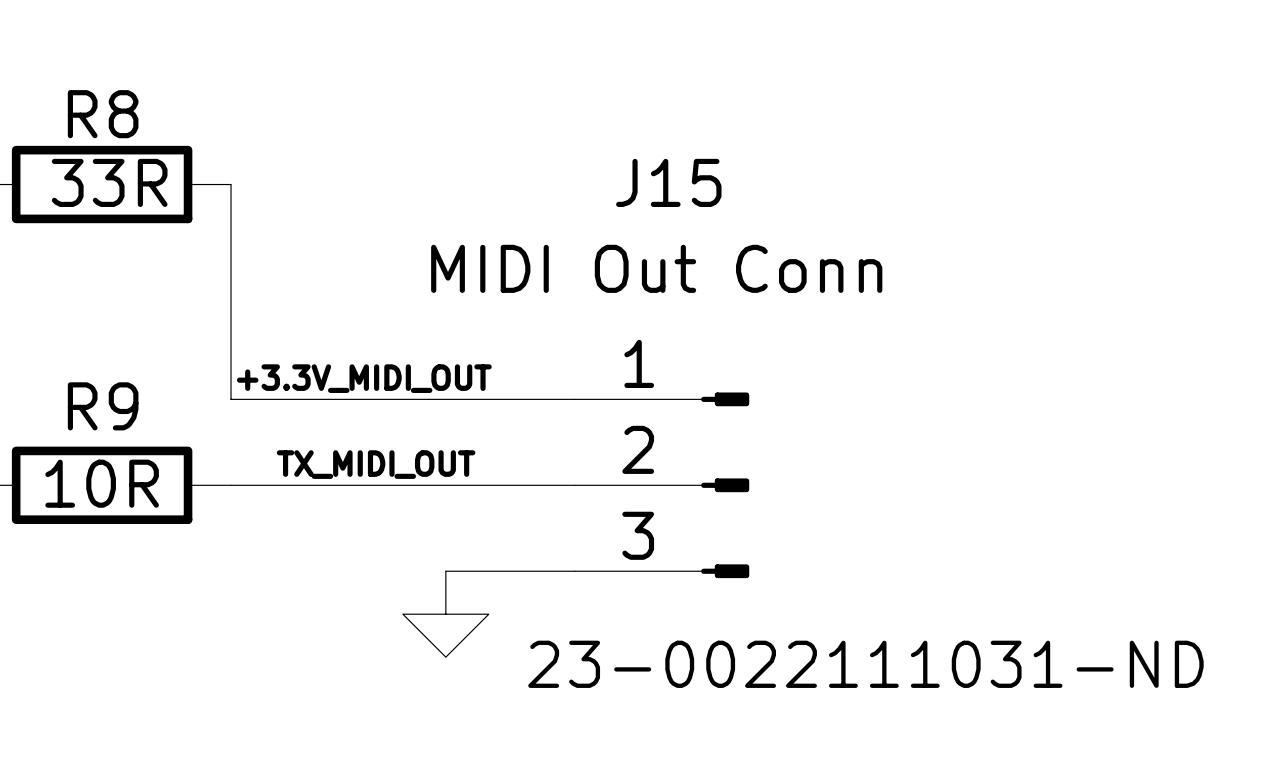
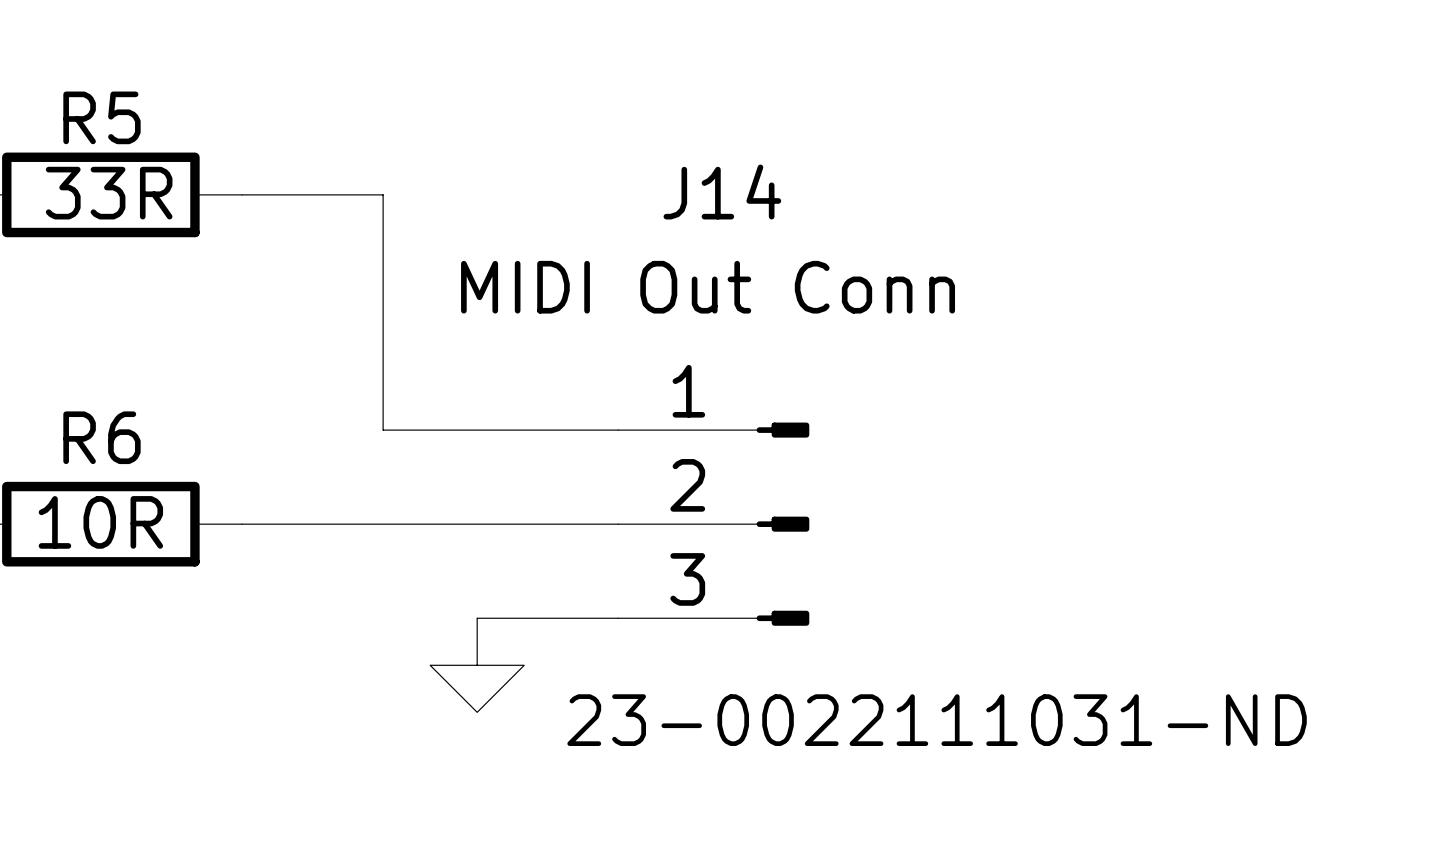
R8 name: R8 (103, 114) -> R5 (101, 117)
J15 name: J15 (668, 182) -> J14 (722, 192)
wire: (231, 184) (231, 399) (359, 399) -> (241, 194) (383, 194) (383, 430)
label: +3.3V_MIDI_OUT (364, 378) -> none
R9 name: R9 (103, 406) -> R6 (101, 437)
label: TX_MIDI_OUT (376, 464) -> none

